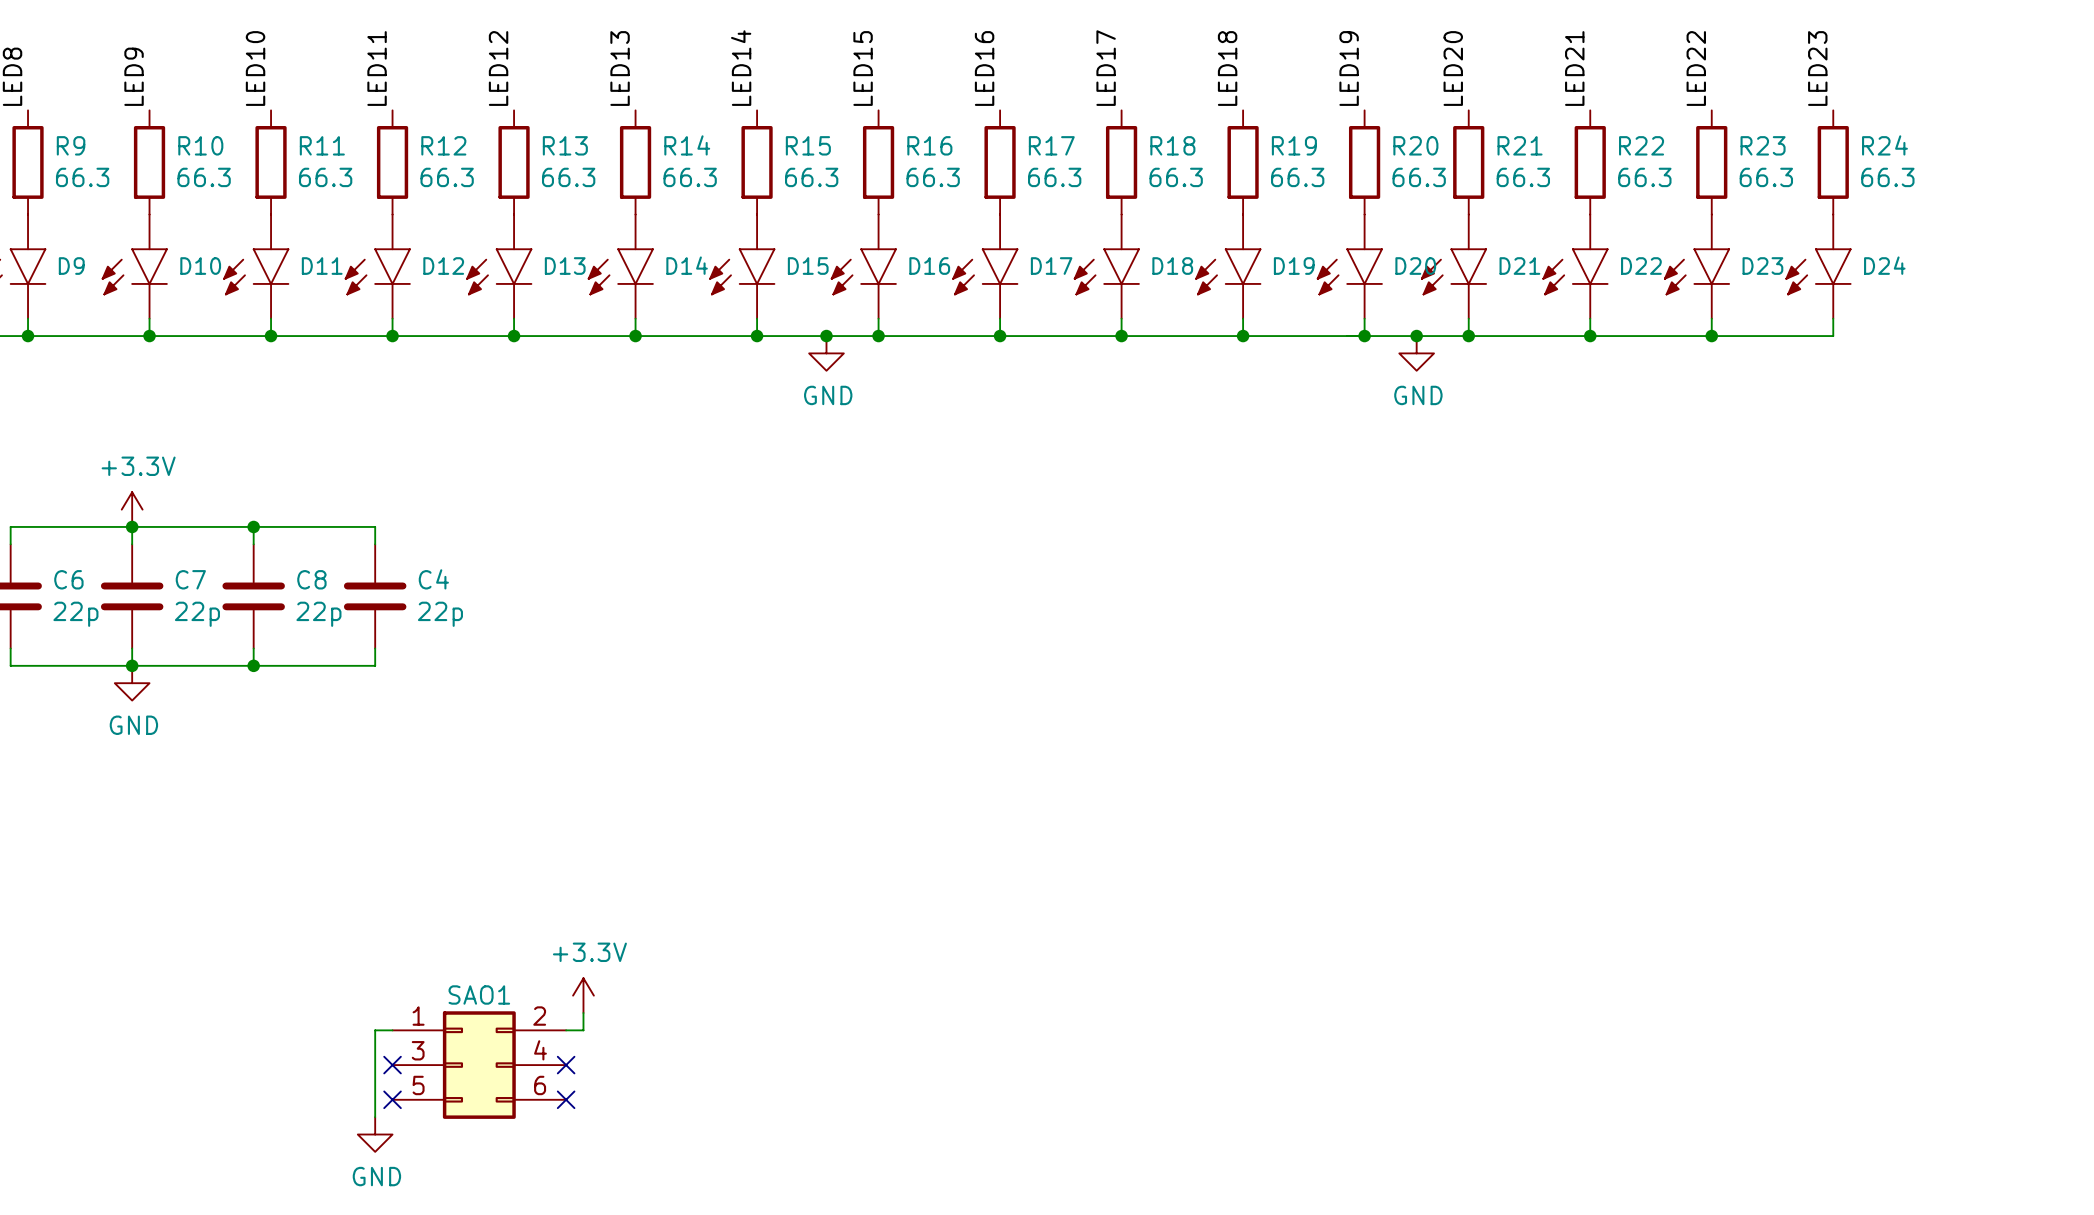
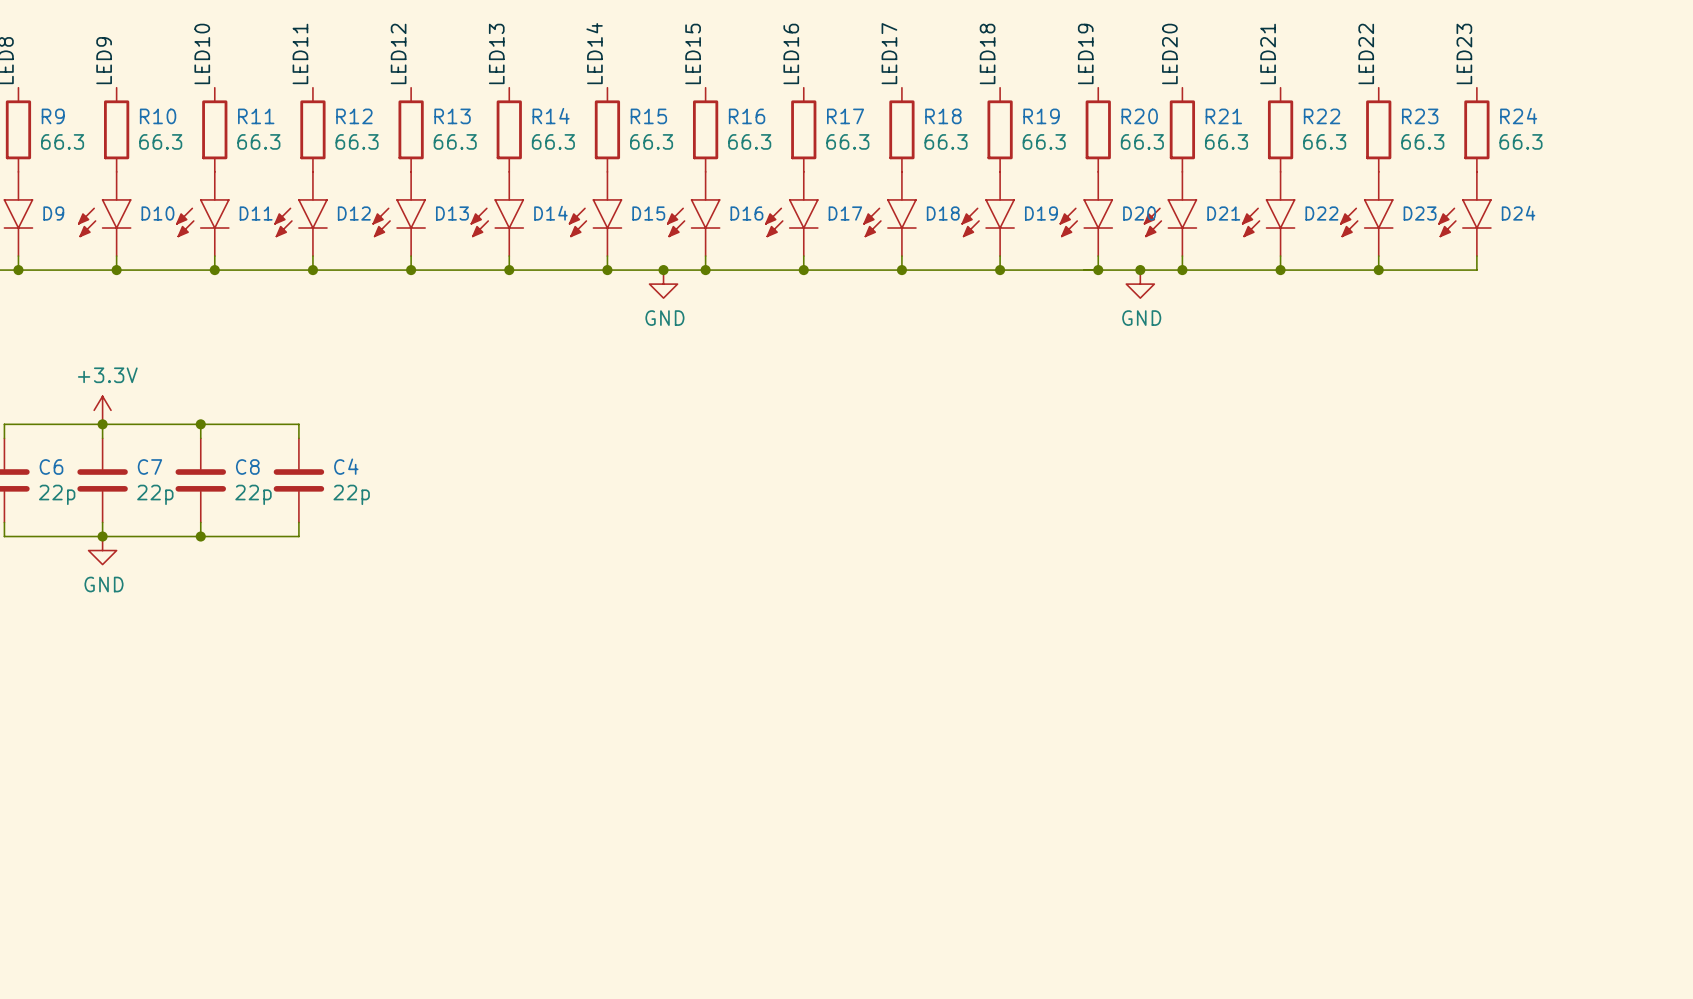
power symbol: +3.3V (583, 995) -> none
wire: (583, 1013) (583, 1030) (566, 1030) -> none
wire: (392, 1030) (375, 1030) (375, 1117) -> none
no-connect mark: (392, 1065) -> none
SAO1: (479, 1065) -> none
no-connect mark: (566, 1065) -> none
no-connect mark: (392, 1099) -> none
no-connect mark: (566, 1099) -> none
power symbol: GND (375, 1134) -> none

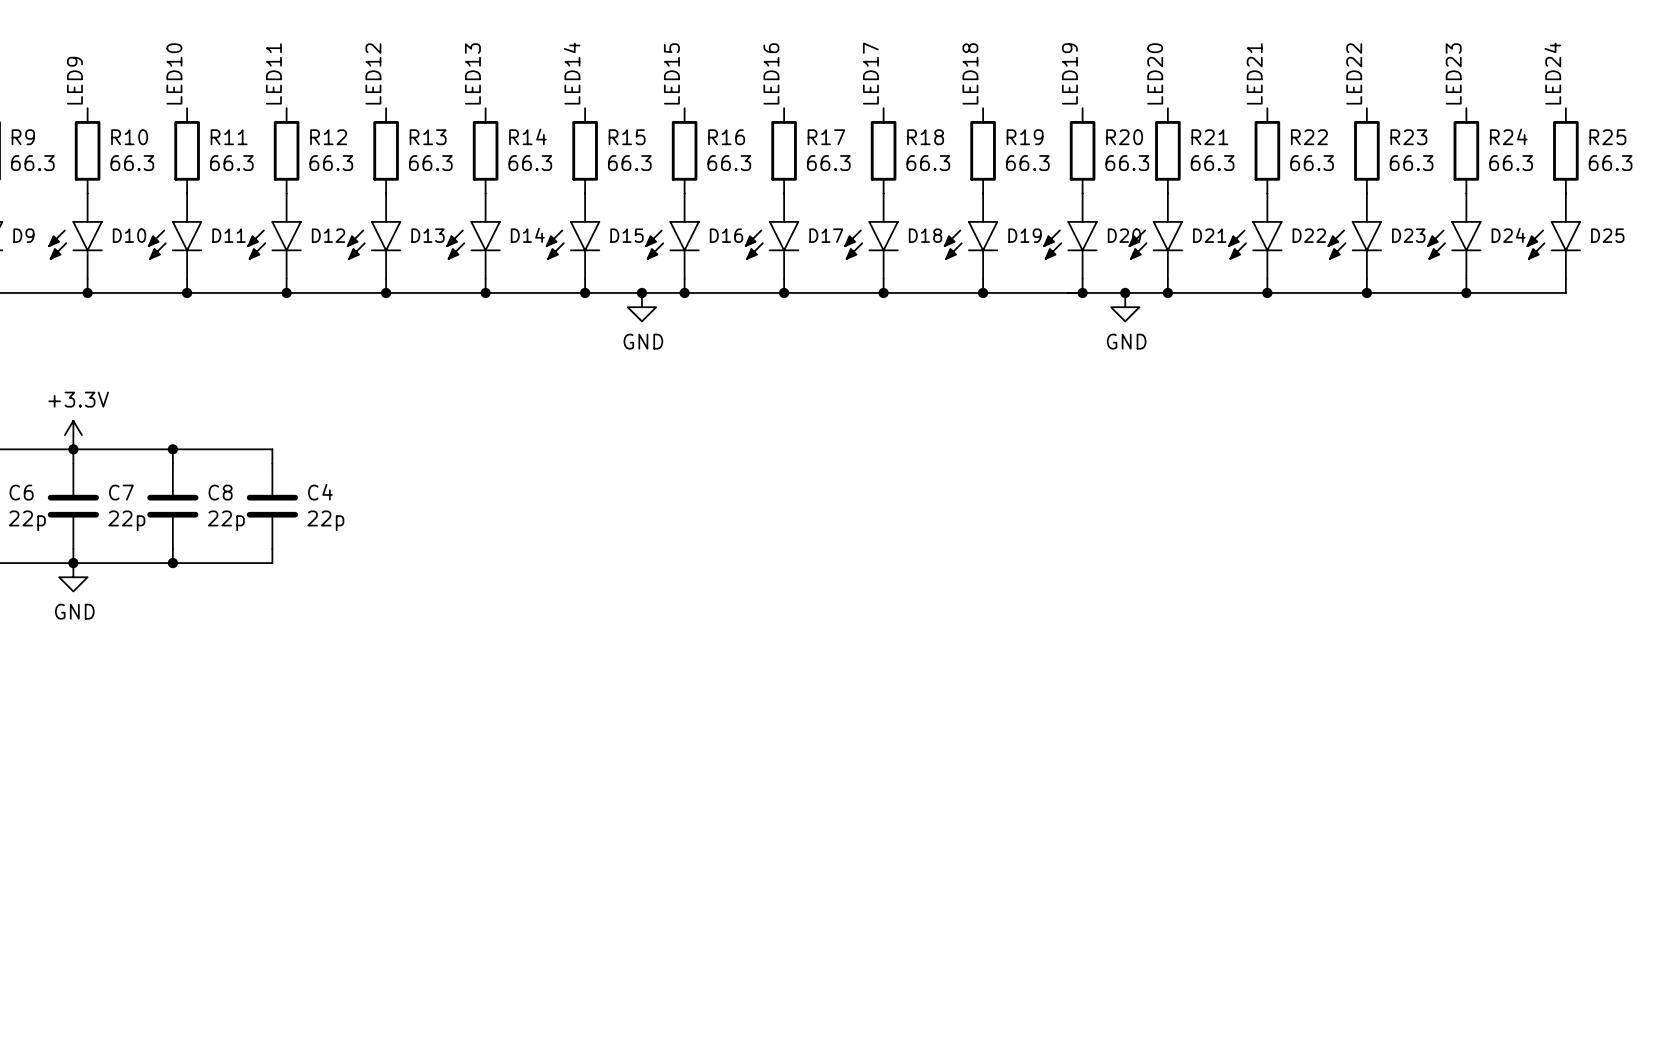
label: none -> LED24 (1552, 73)
R25: none -> 66.3 (1565, 150)
D25: none -> (1553, 236)
wire: none -> (1565, 278) (1565, 292) (1466, 292)
junction: none -> (1466, 292)

